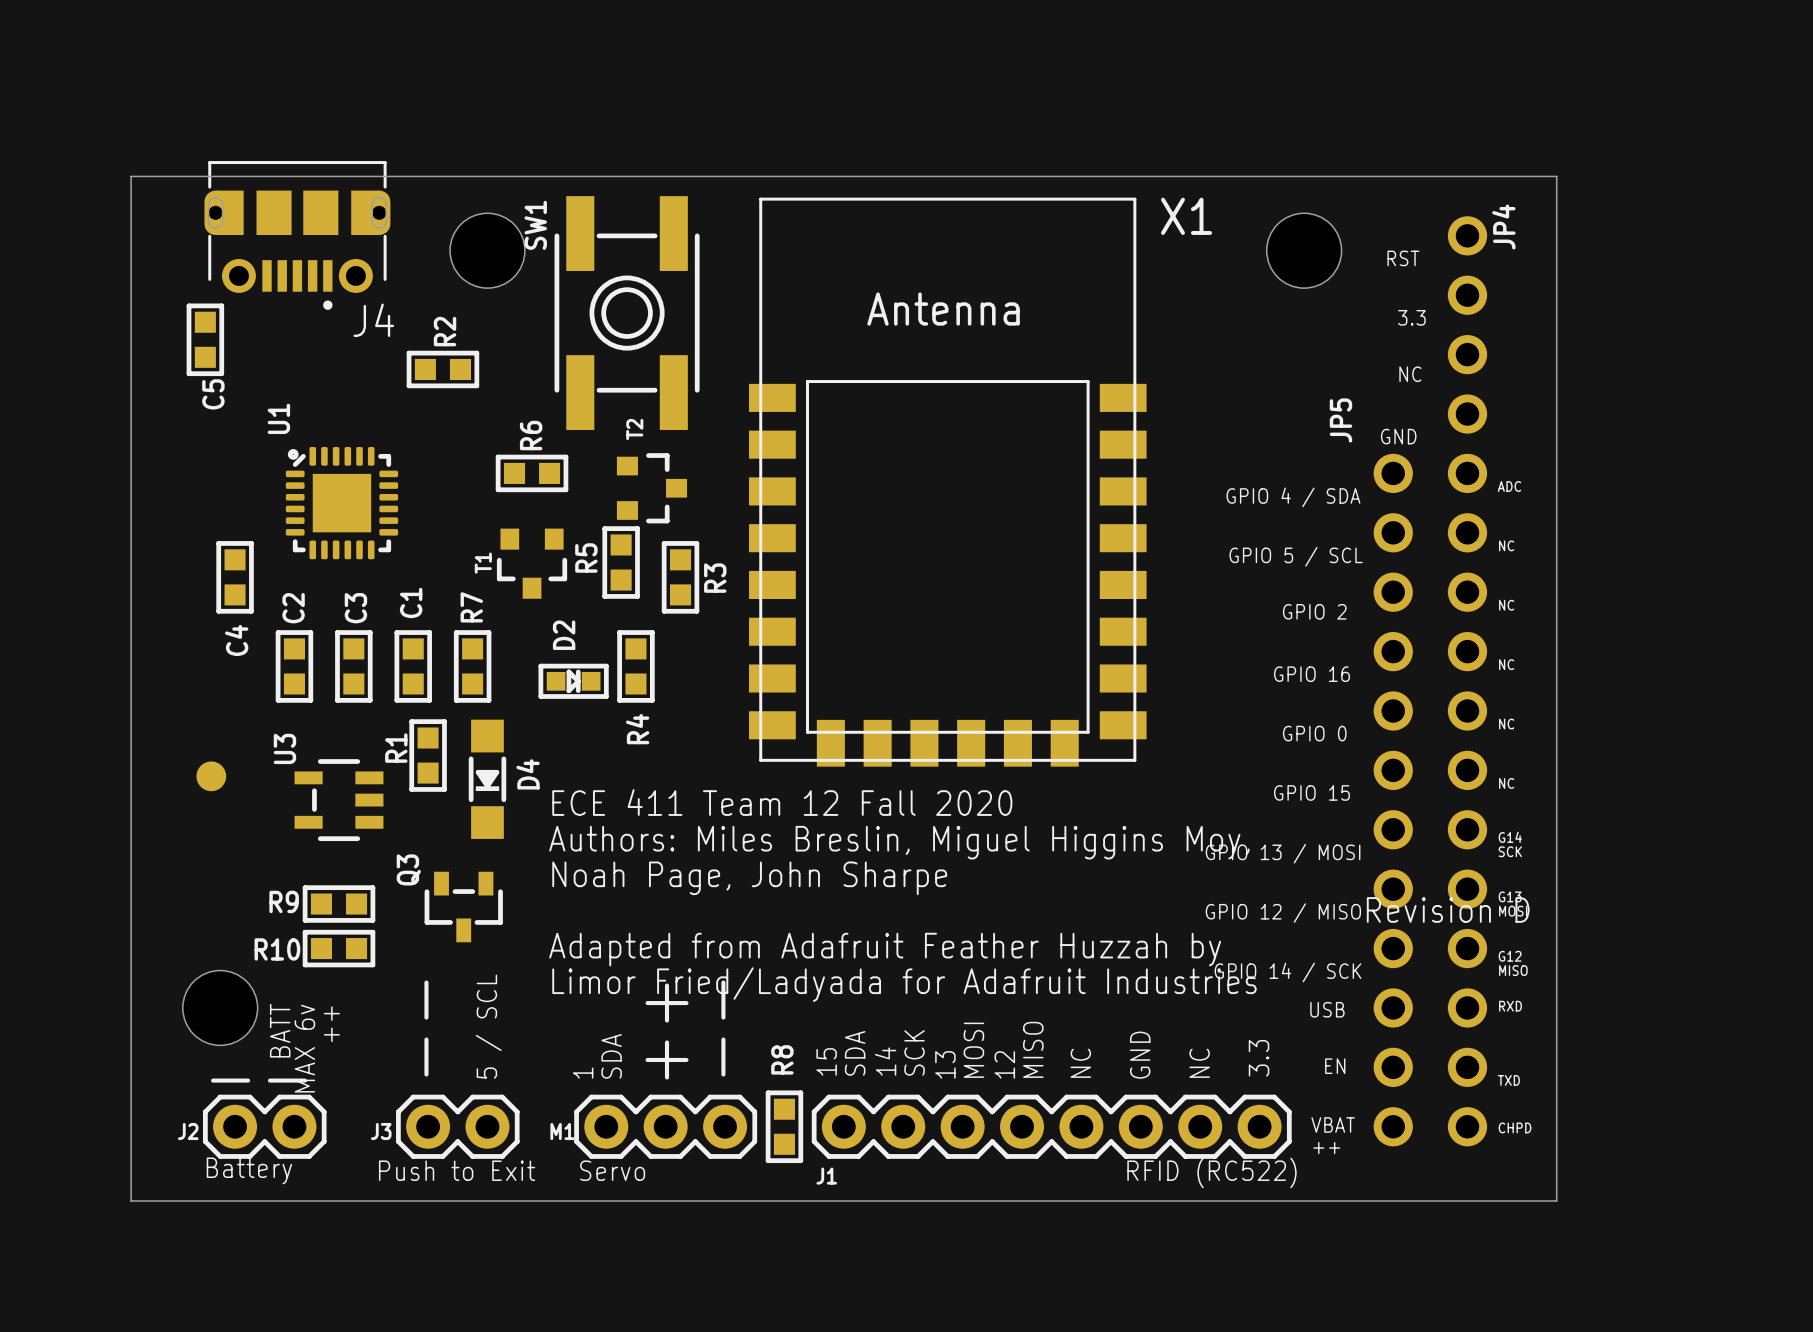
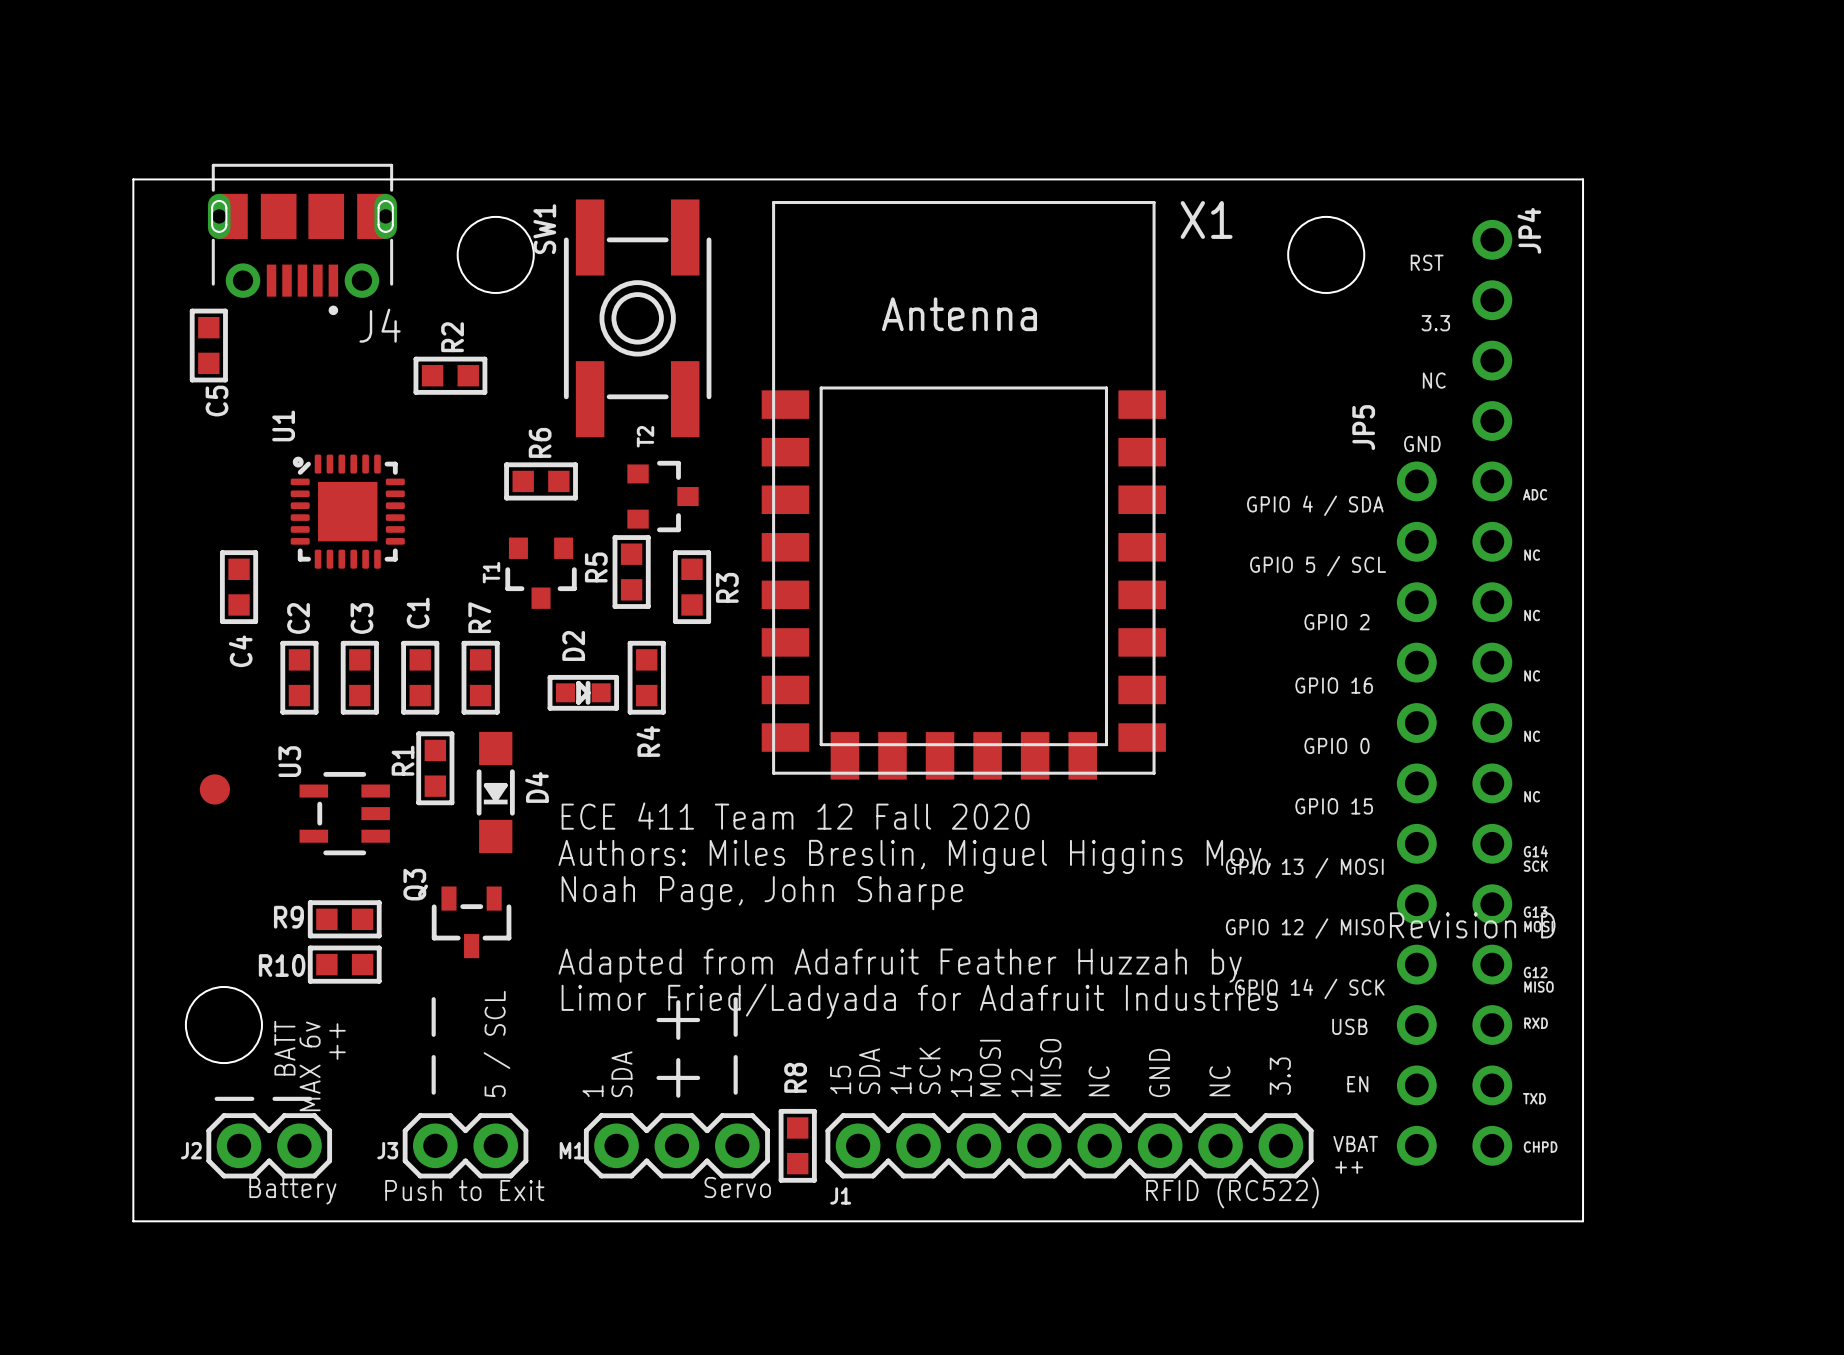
text position: Battery (249, 1170) -> Battery (292, 1190)
text position: Servo (612, 1170) -> Servo (737, 1187)

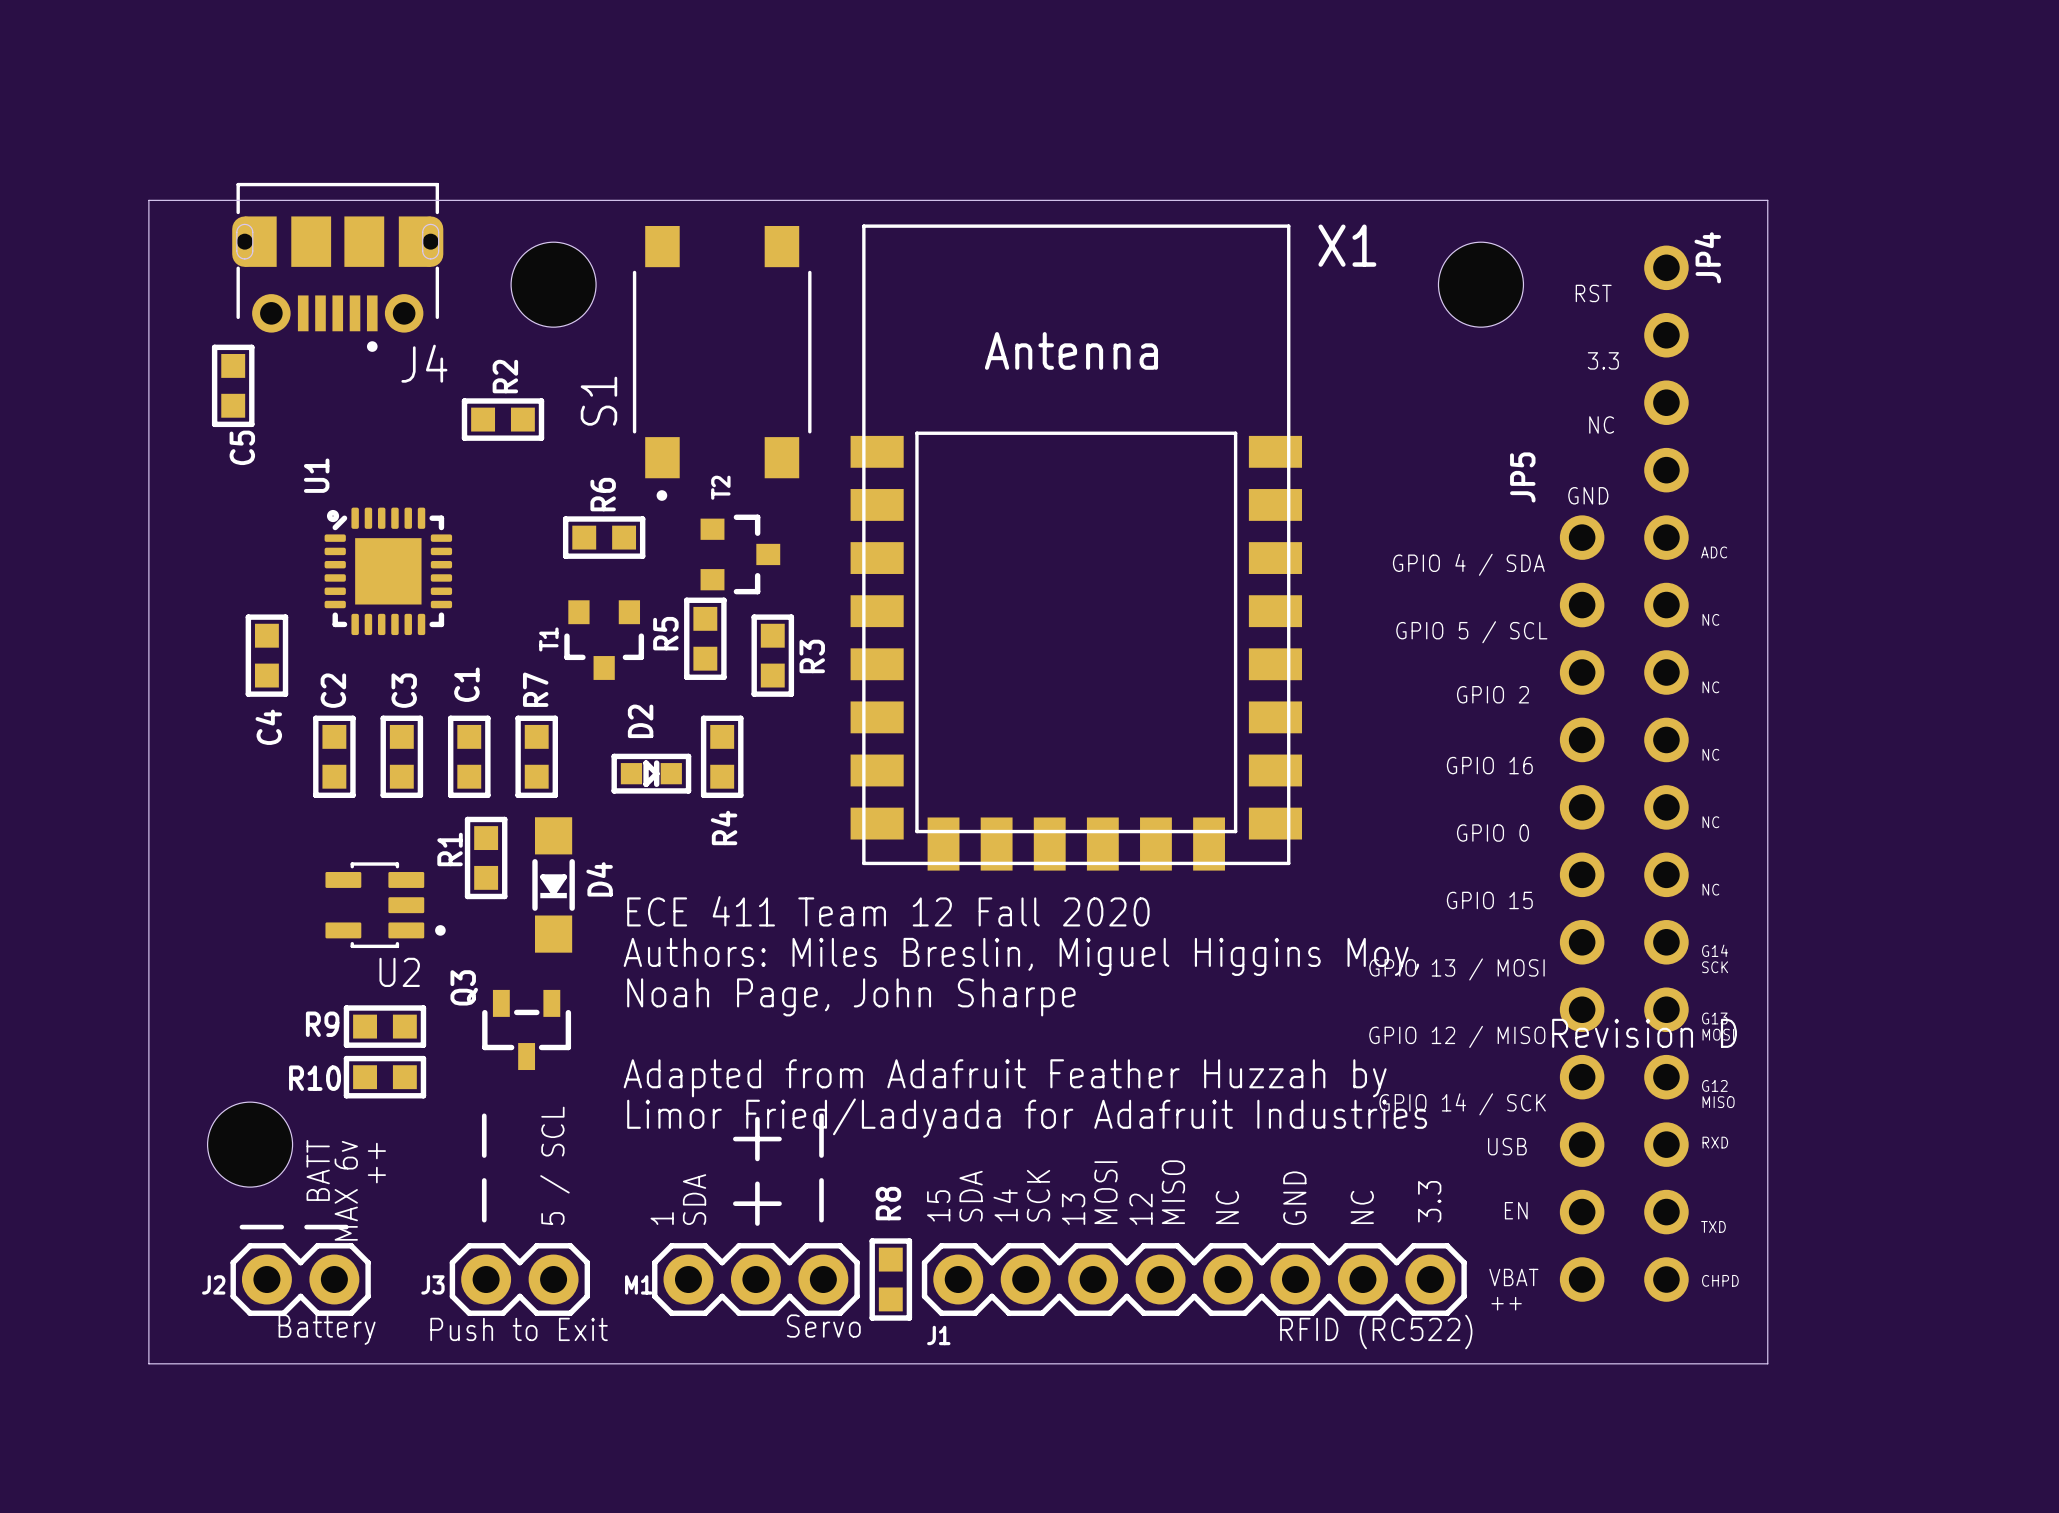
SW1: (637, 318) -> none
S1: none -> (722, 363)
part: (214, 789) -> none
U2: none -> (385, 905)
U3: (344, 813) -> none

